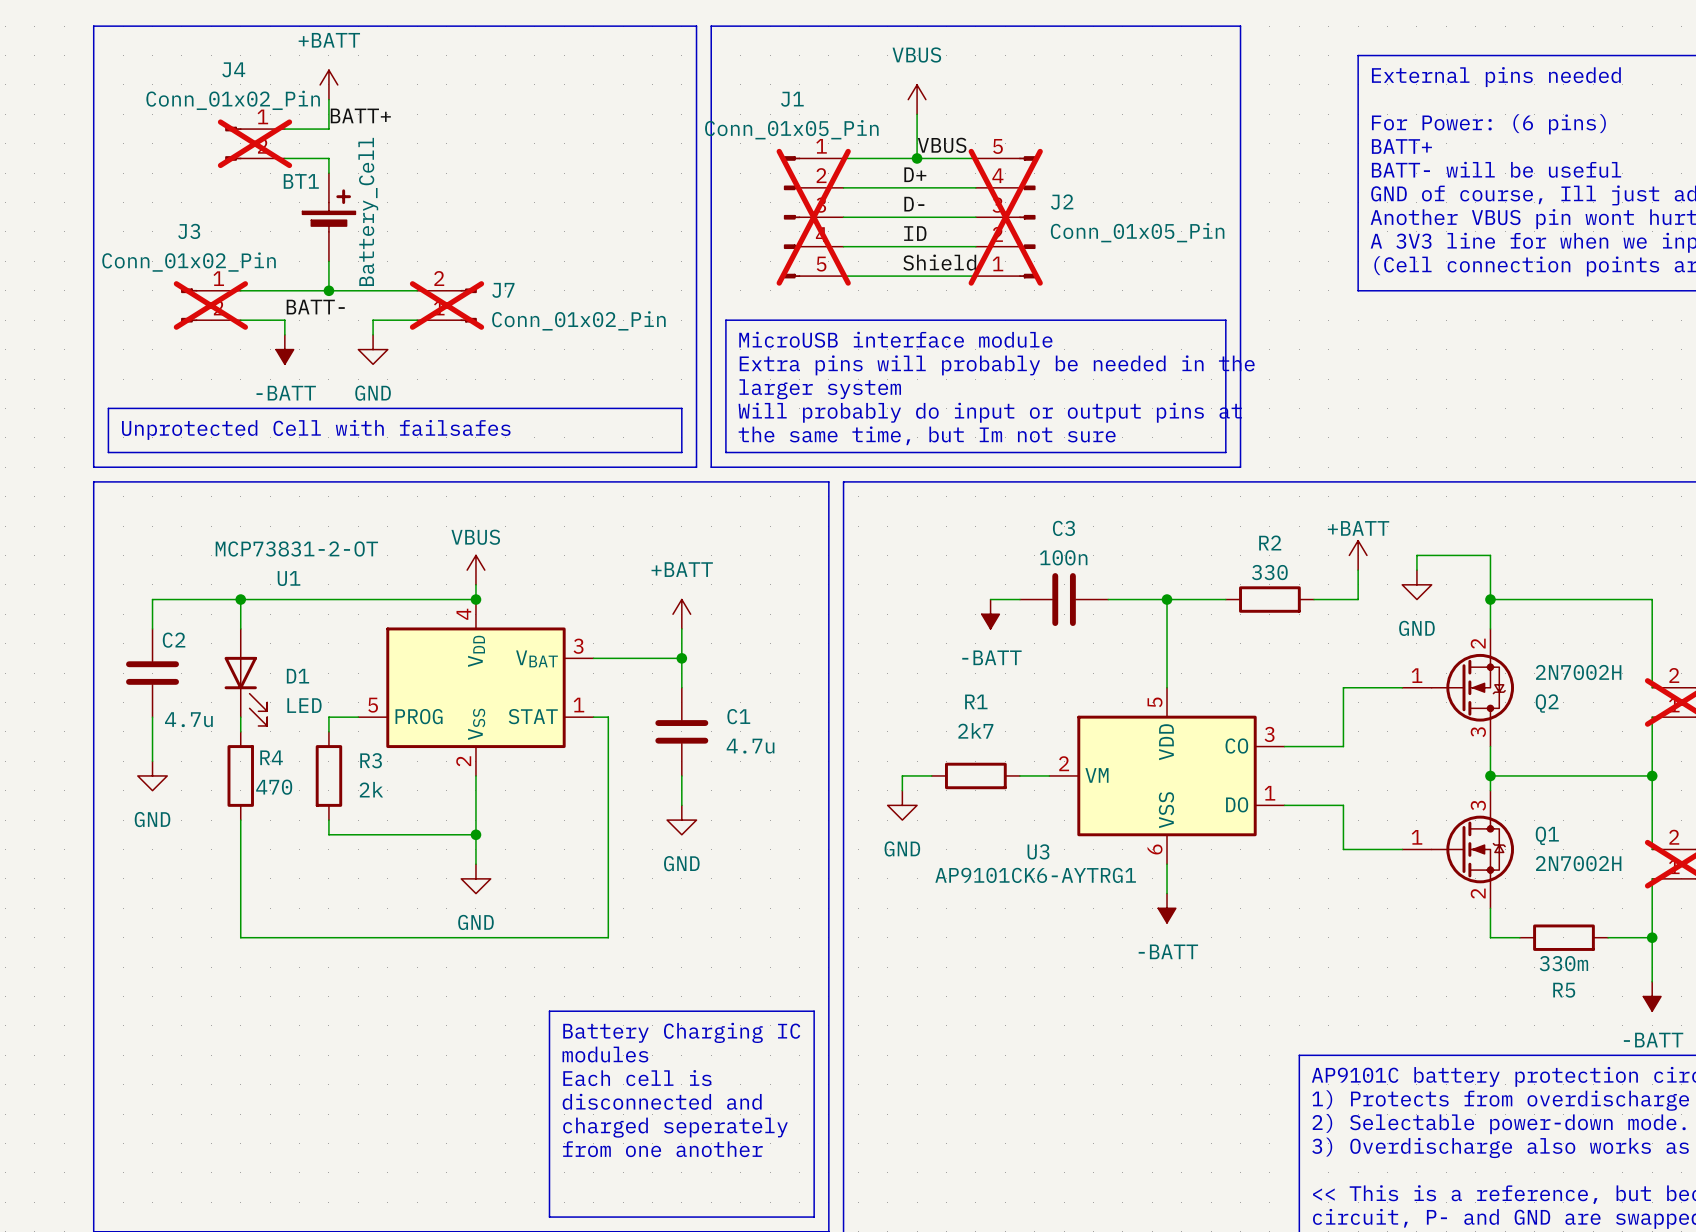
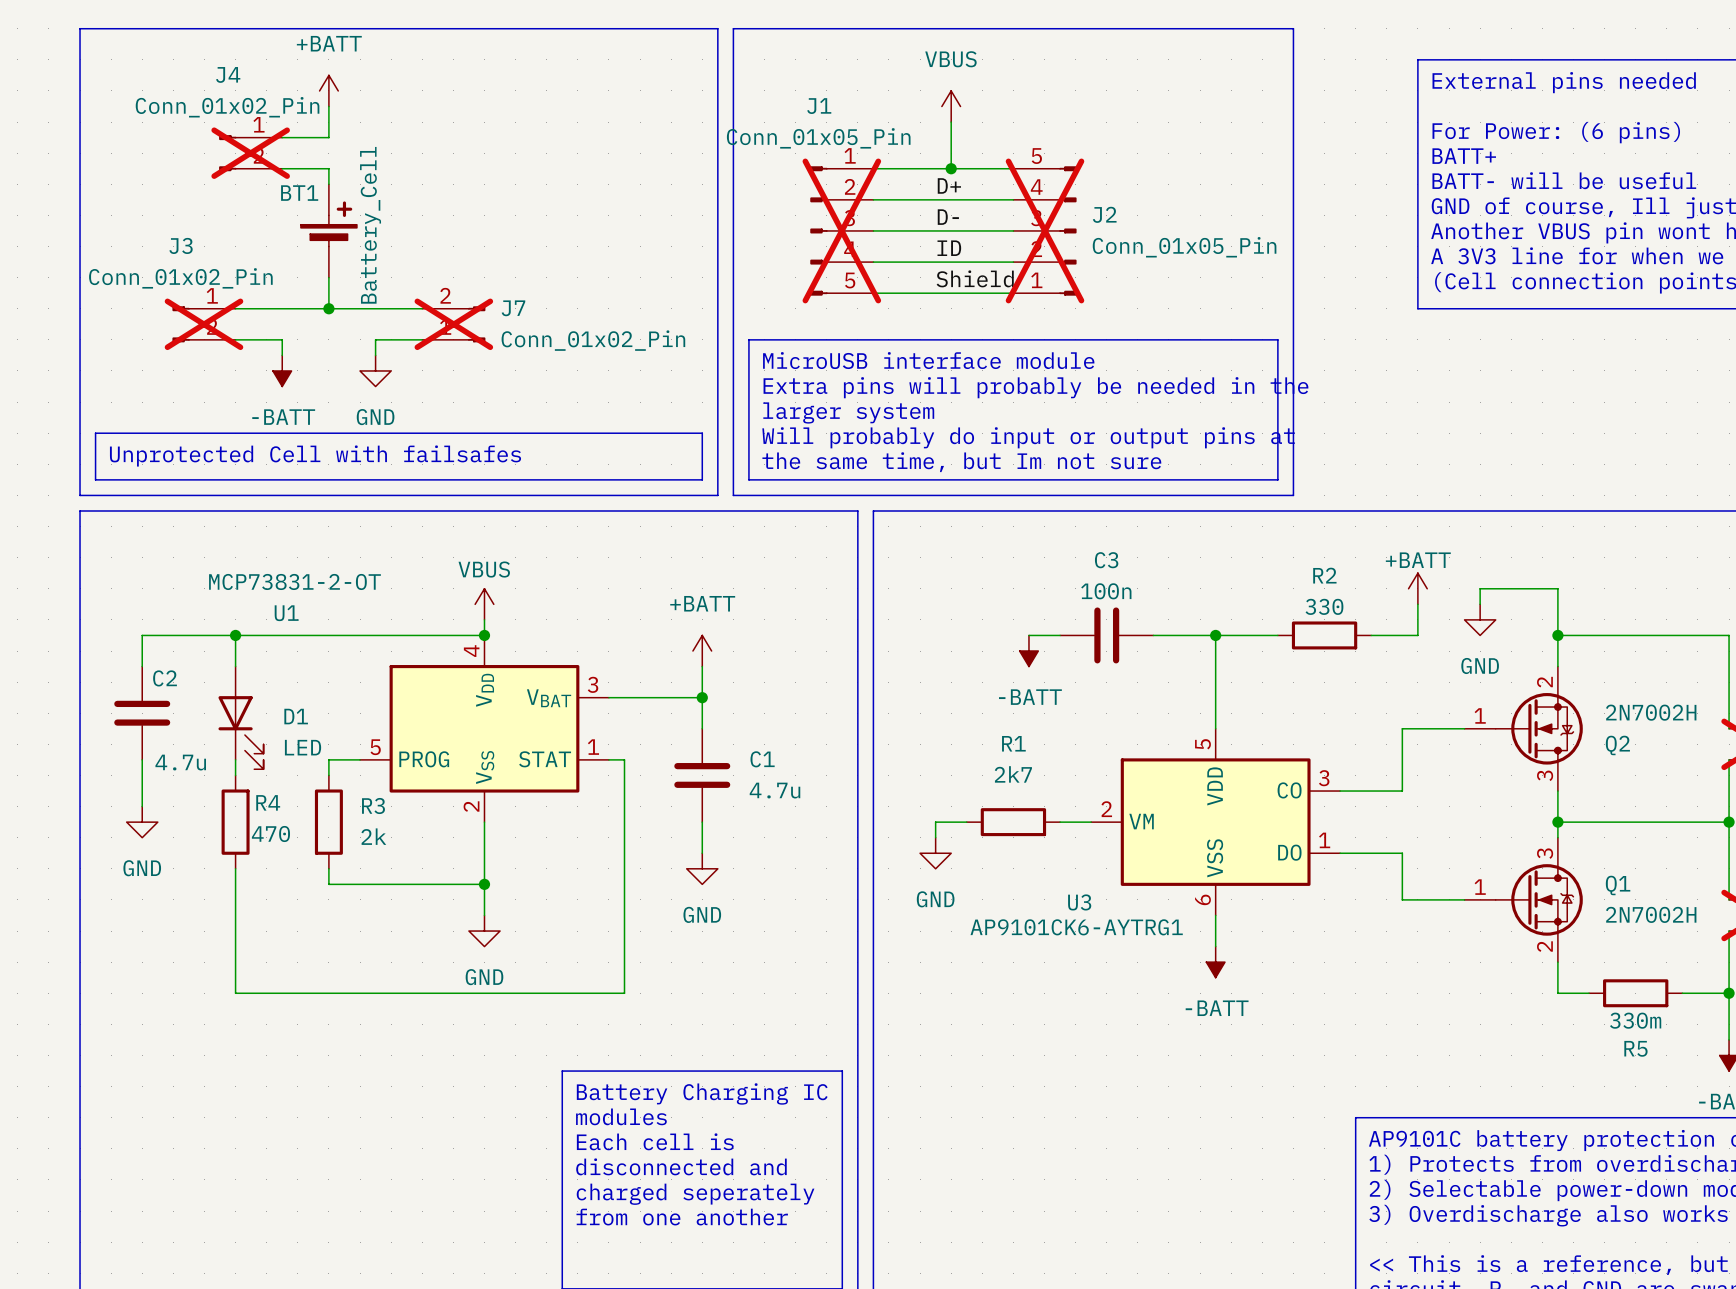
label: BATT+ (360, 115) -> none
label: VBUS (942, 145) -> none
label: BATT- (315, 307) -> none

